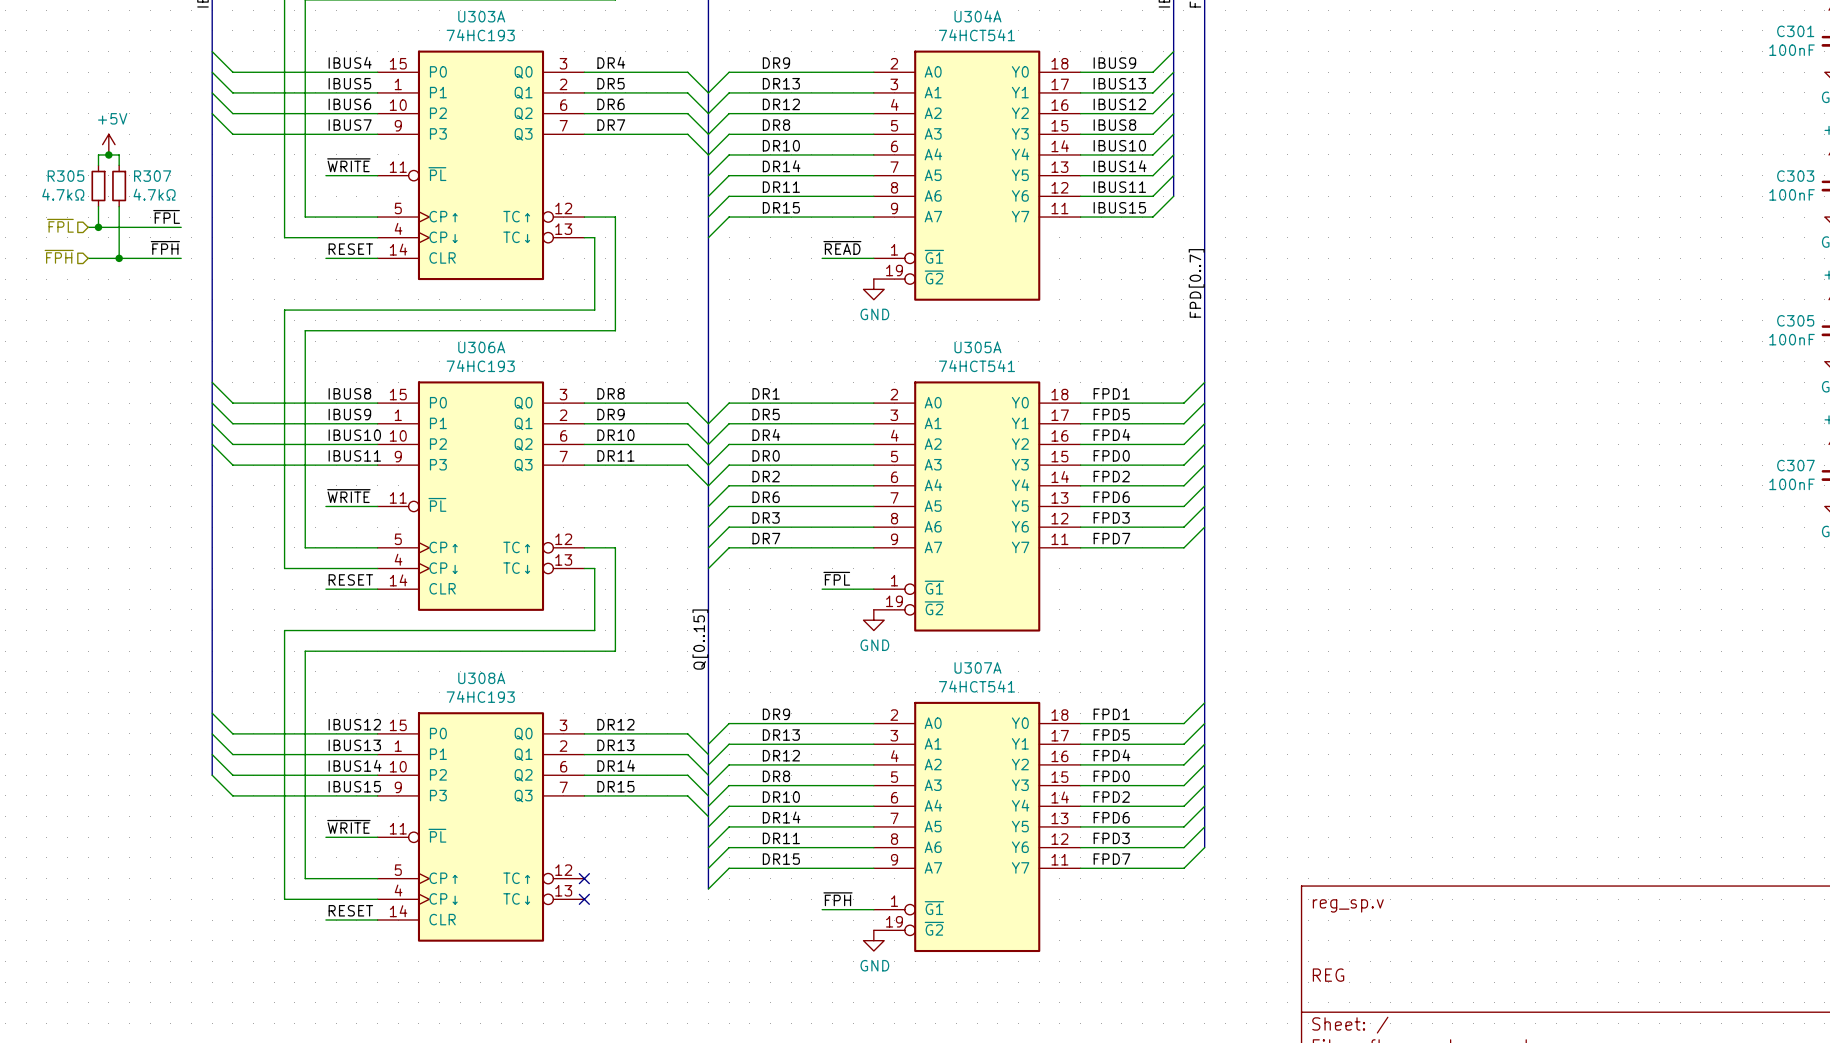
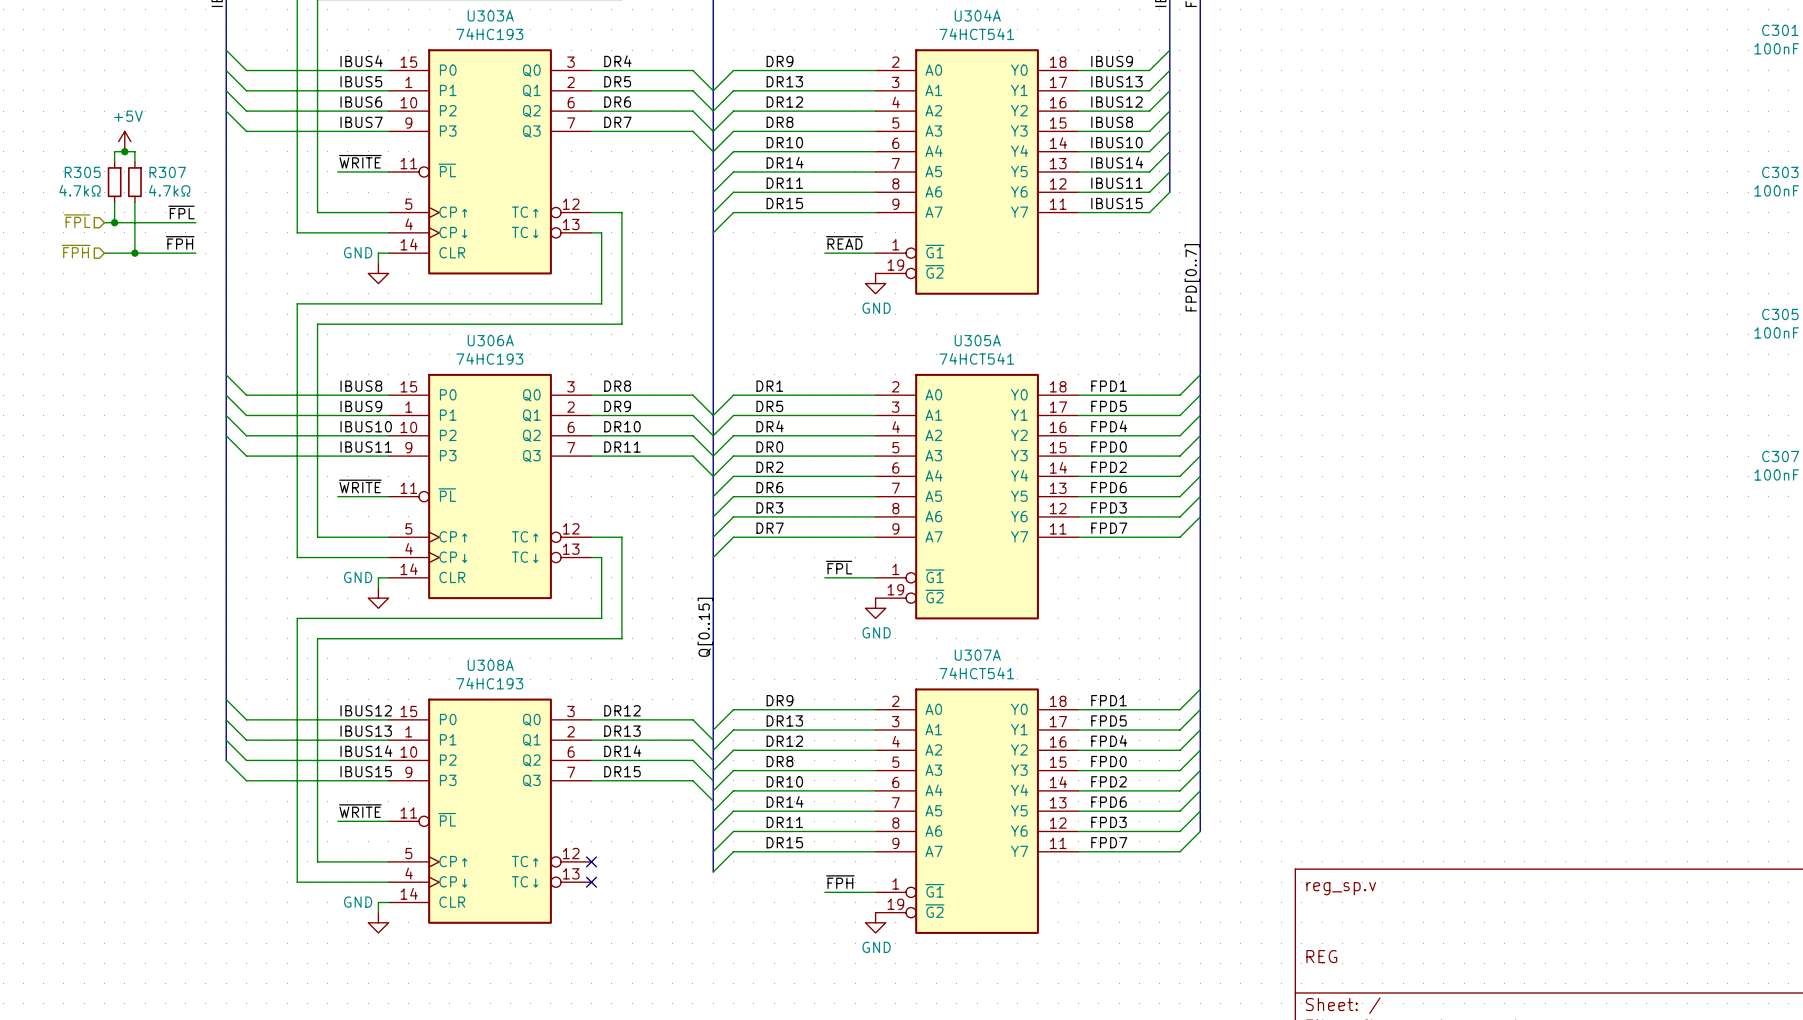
label: RESET (350, 249) -> none
wire: (325, 258) (367, 258) -> (378, 263) (378, 253)
power symbol: none -> GND (378, 273)
label: RESET (350, 579) -> none
wire: (325, 589) (367, 589) -> (378, 587) (378, 577)
power symbol: none -> GND (378, 598)
label: RESET (350, 910) -> none
wire: (325, 920) (367, 920) -> (378, 912) (378, 902)
power symbol: none -> GND (378, 922)

